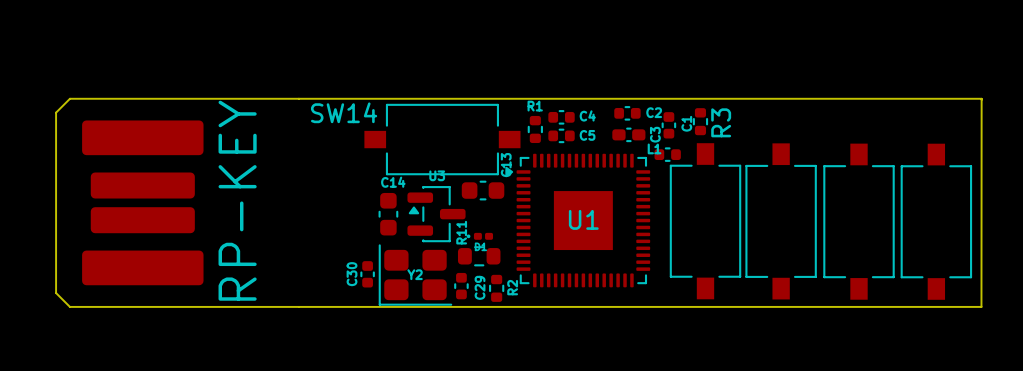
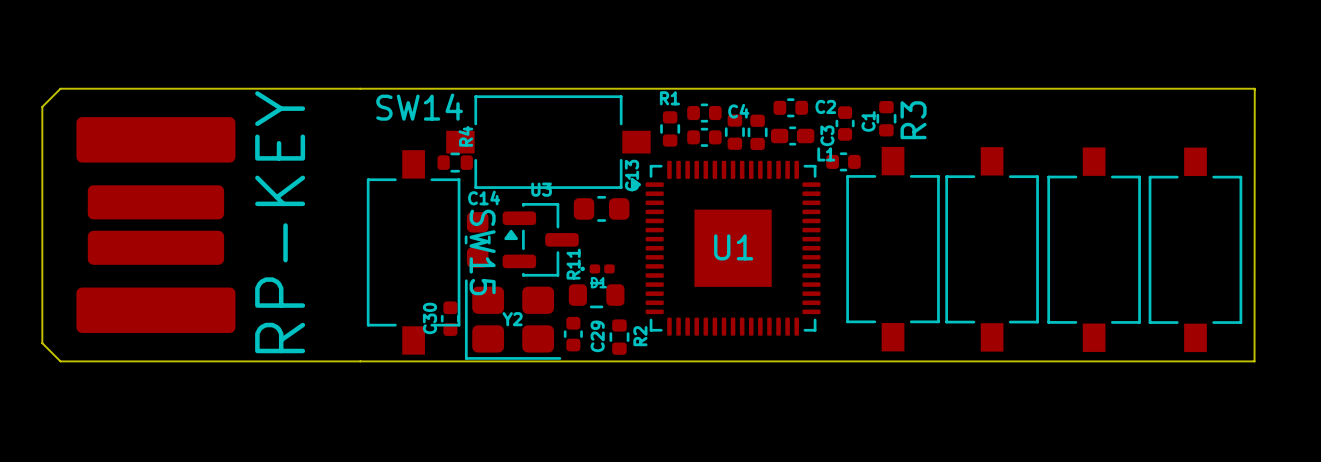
part: none -> (734, 132)
part: none -> (757, 132)
C5 name: C5 (587, 135) -> none
R4: none -> (455, 162)
SW15: none -> (413, 252)

